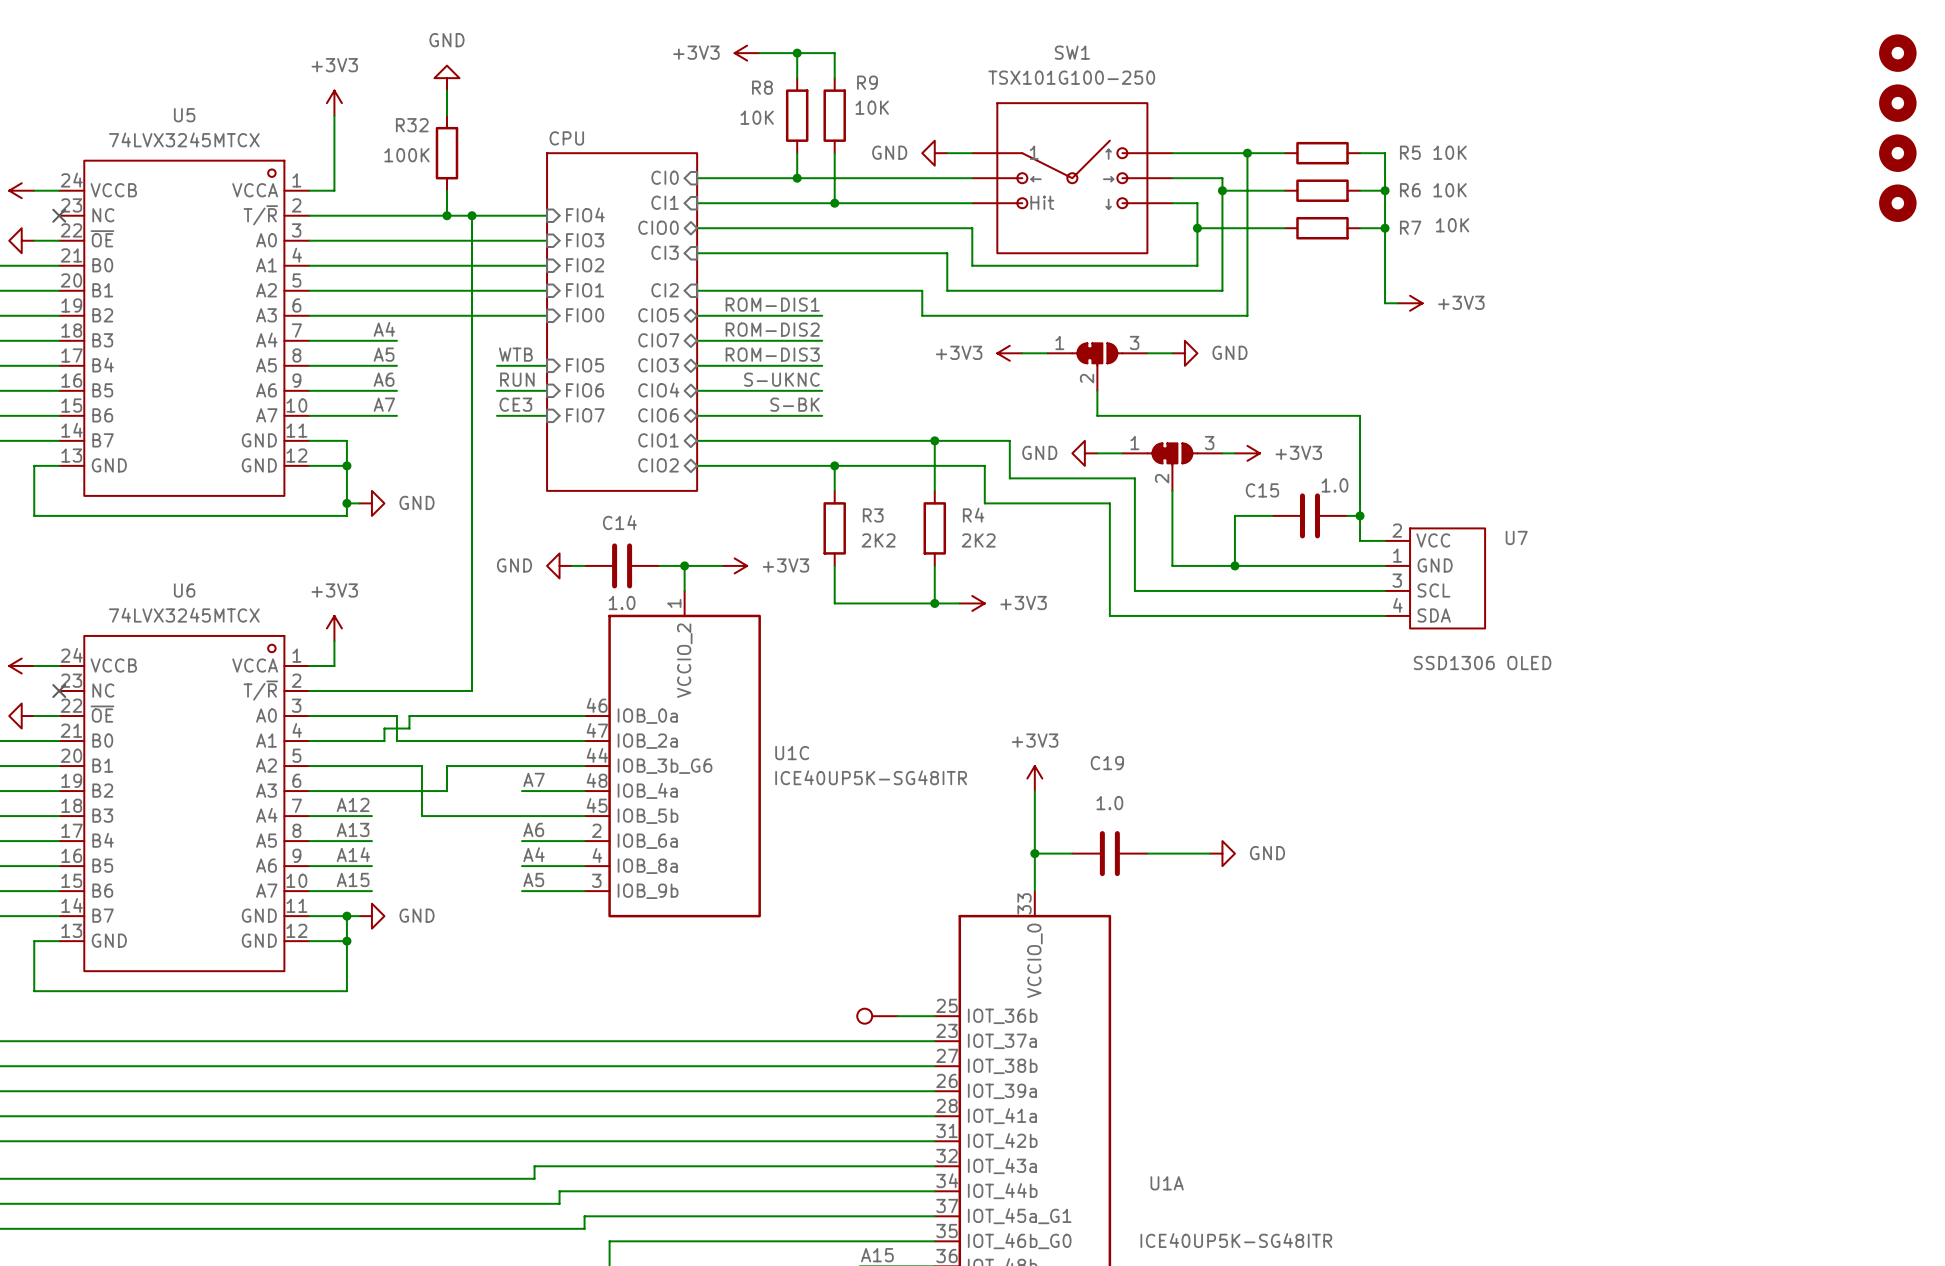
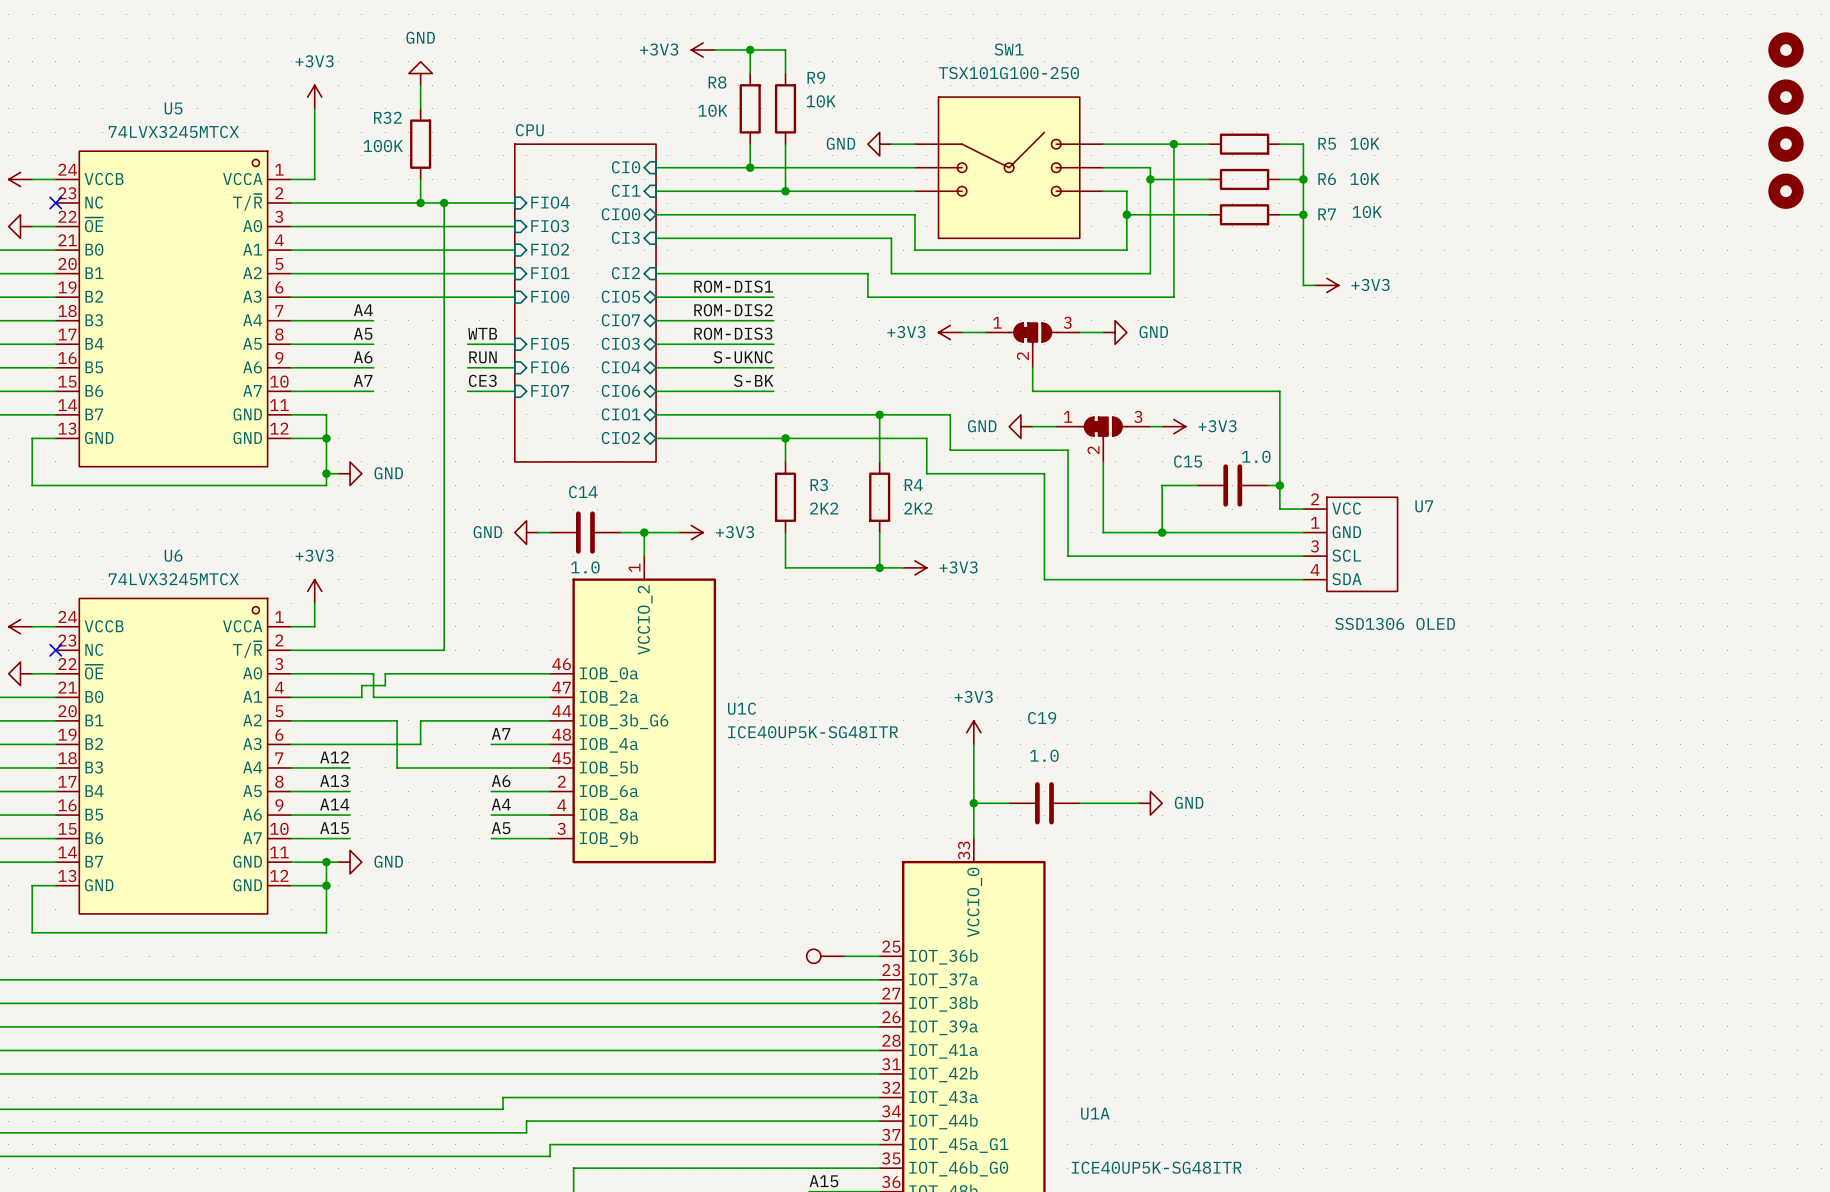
SW1 pin name: 1 (1034, 152) -> none
SW1 pin name: ↑ (1108, 154) -> none
SW1 pin name: ← (1036, 179) -> none
SW1 pin name: → (1108, 179) -> none
SW1 pin name: Hit (1042, 202) -> none
SW1 pin name: ↓ (1108, 204) -> none

